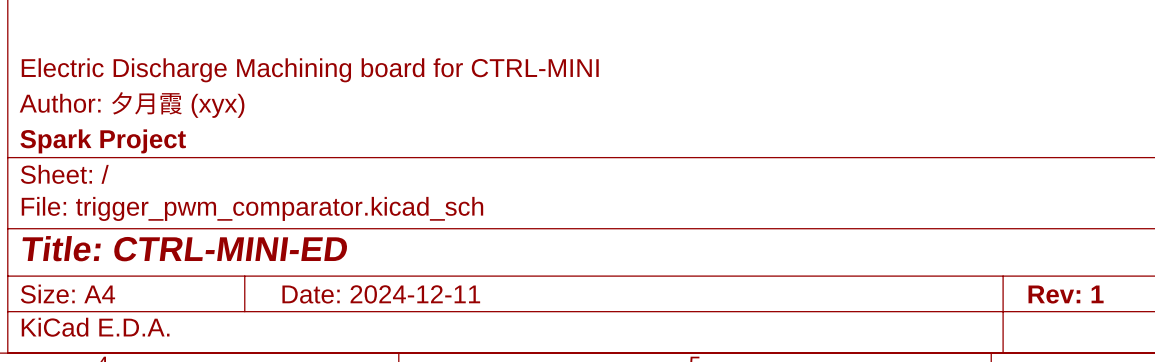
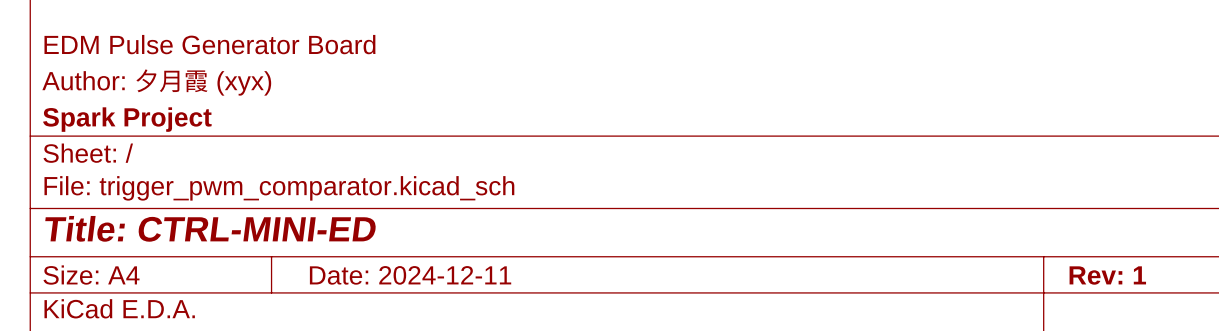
title block: Electric Discharge Machining board for CTRL-MINI (310, 70) -> EDM Pulse Generator Board (209, 44)

